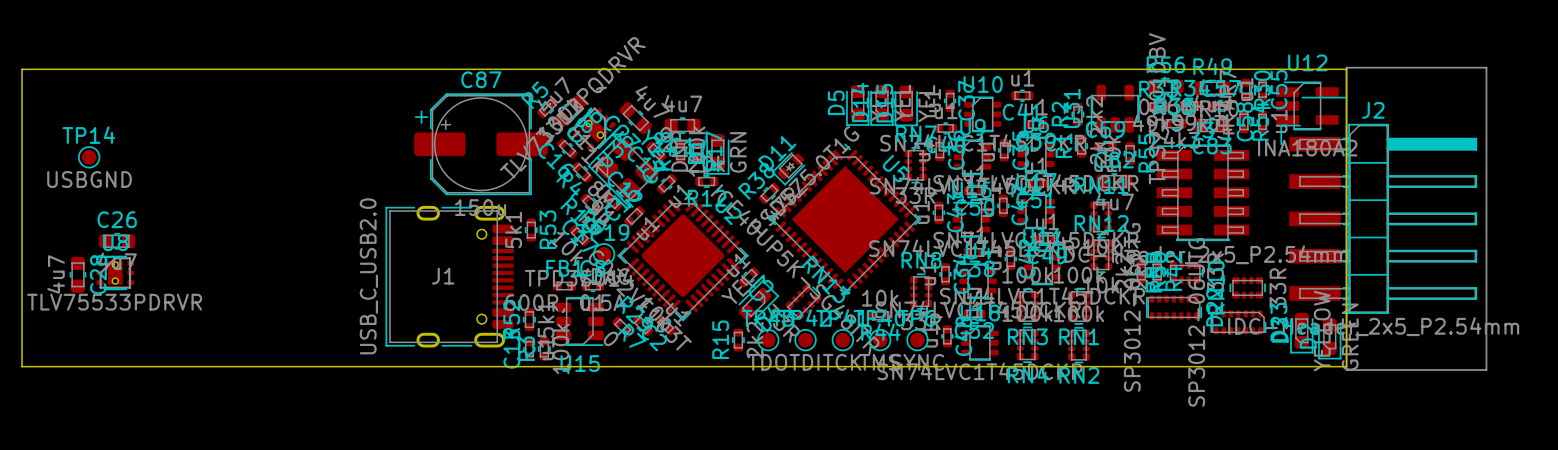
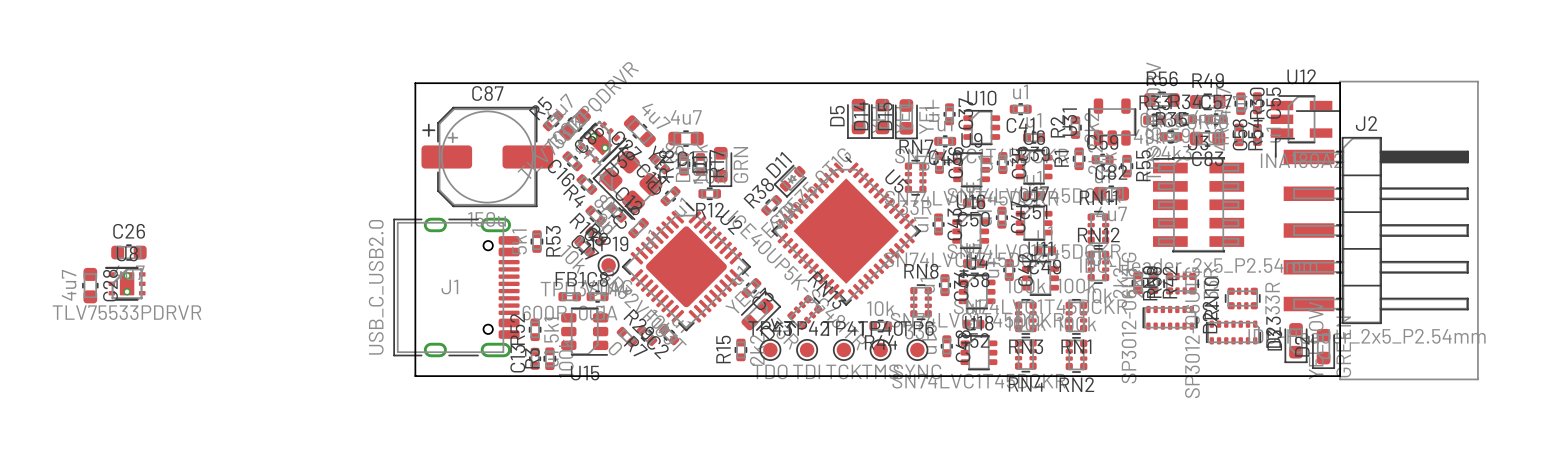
board edge: (407, 69) (22, 69) (22, 366) (407, 366) -> (415, 83) (415, 376)
TP14: USBGND (89, 157) -> none

